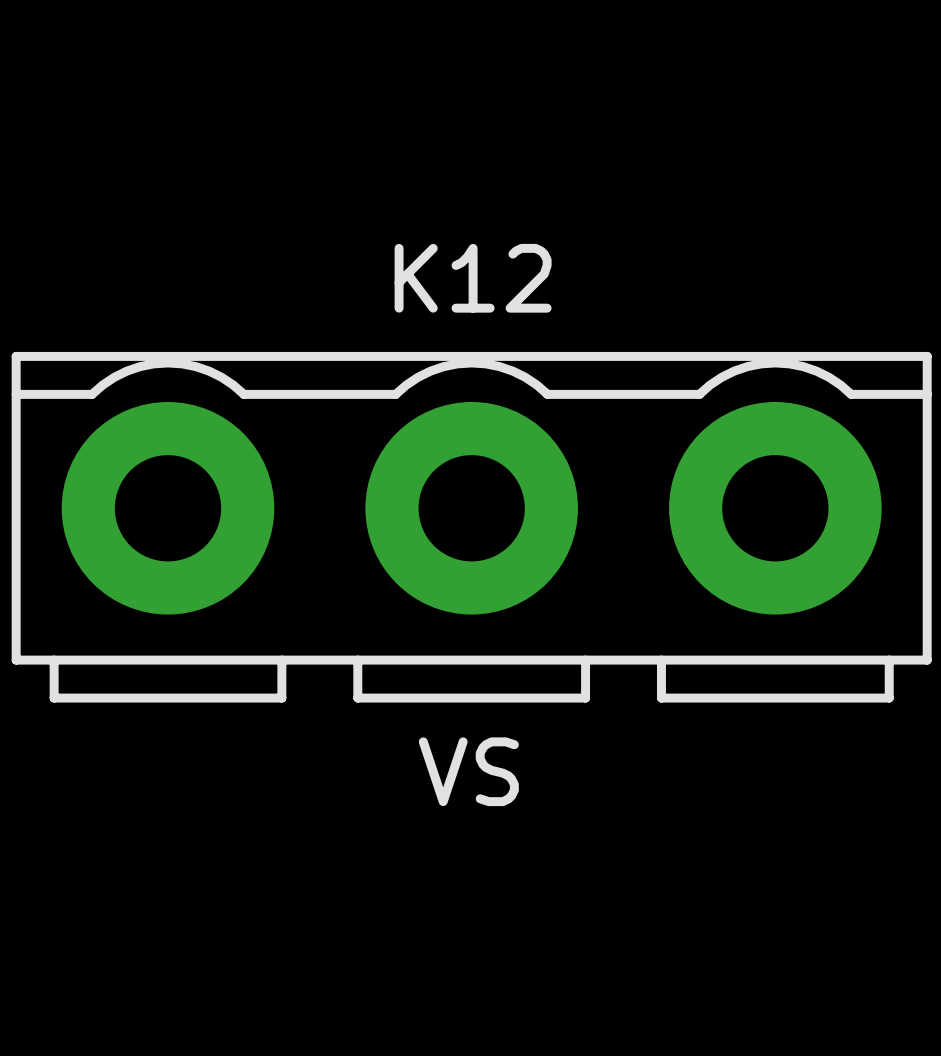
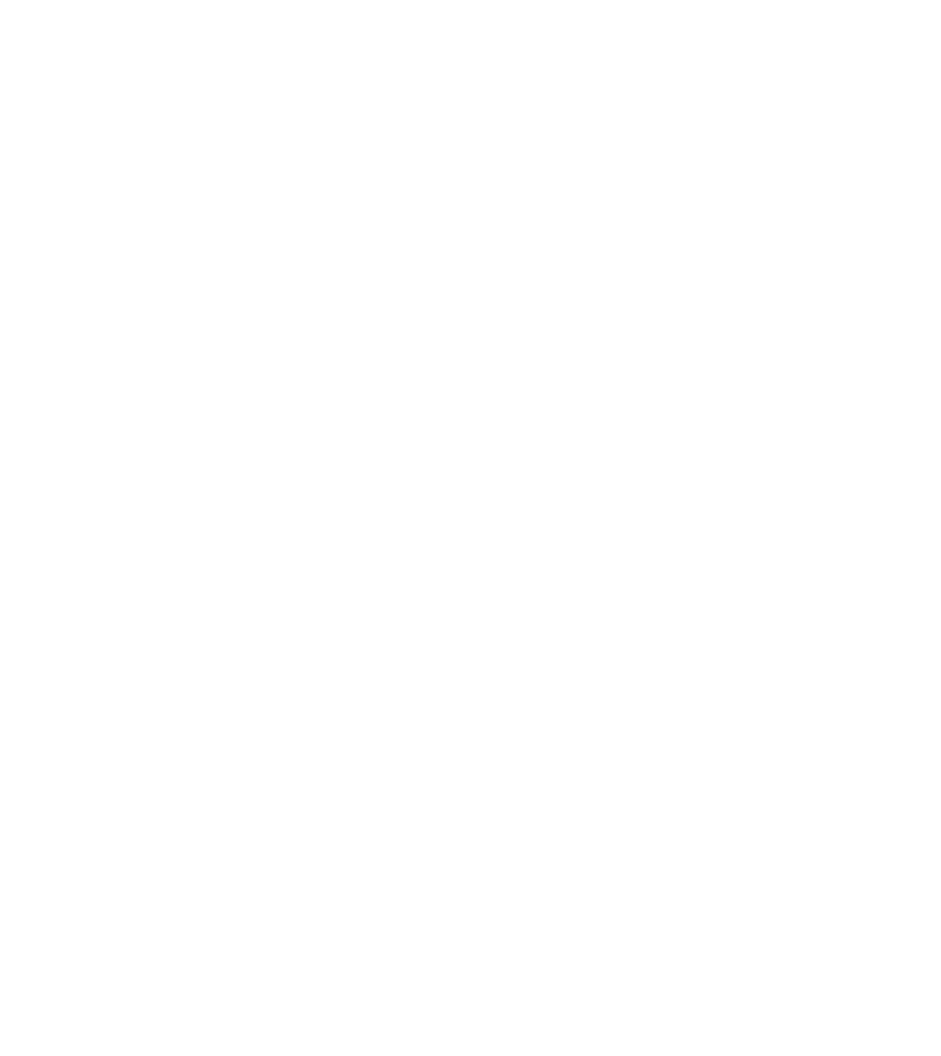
K12: VS (471, 527) -> none

